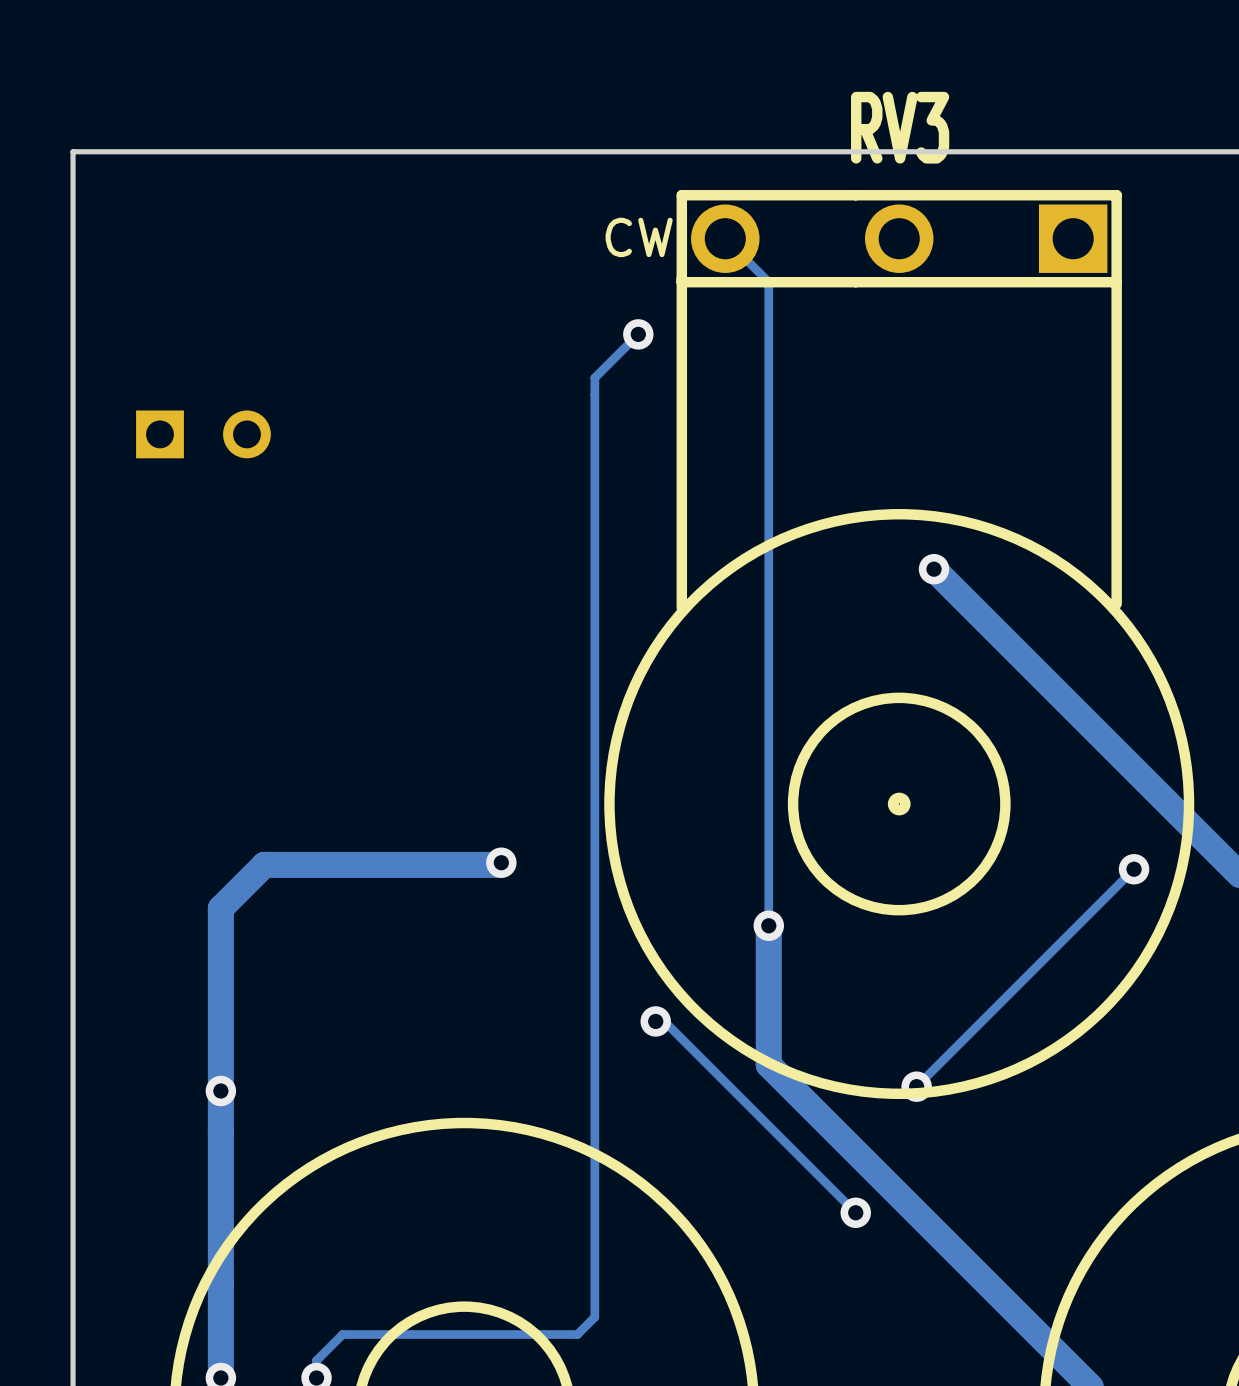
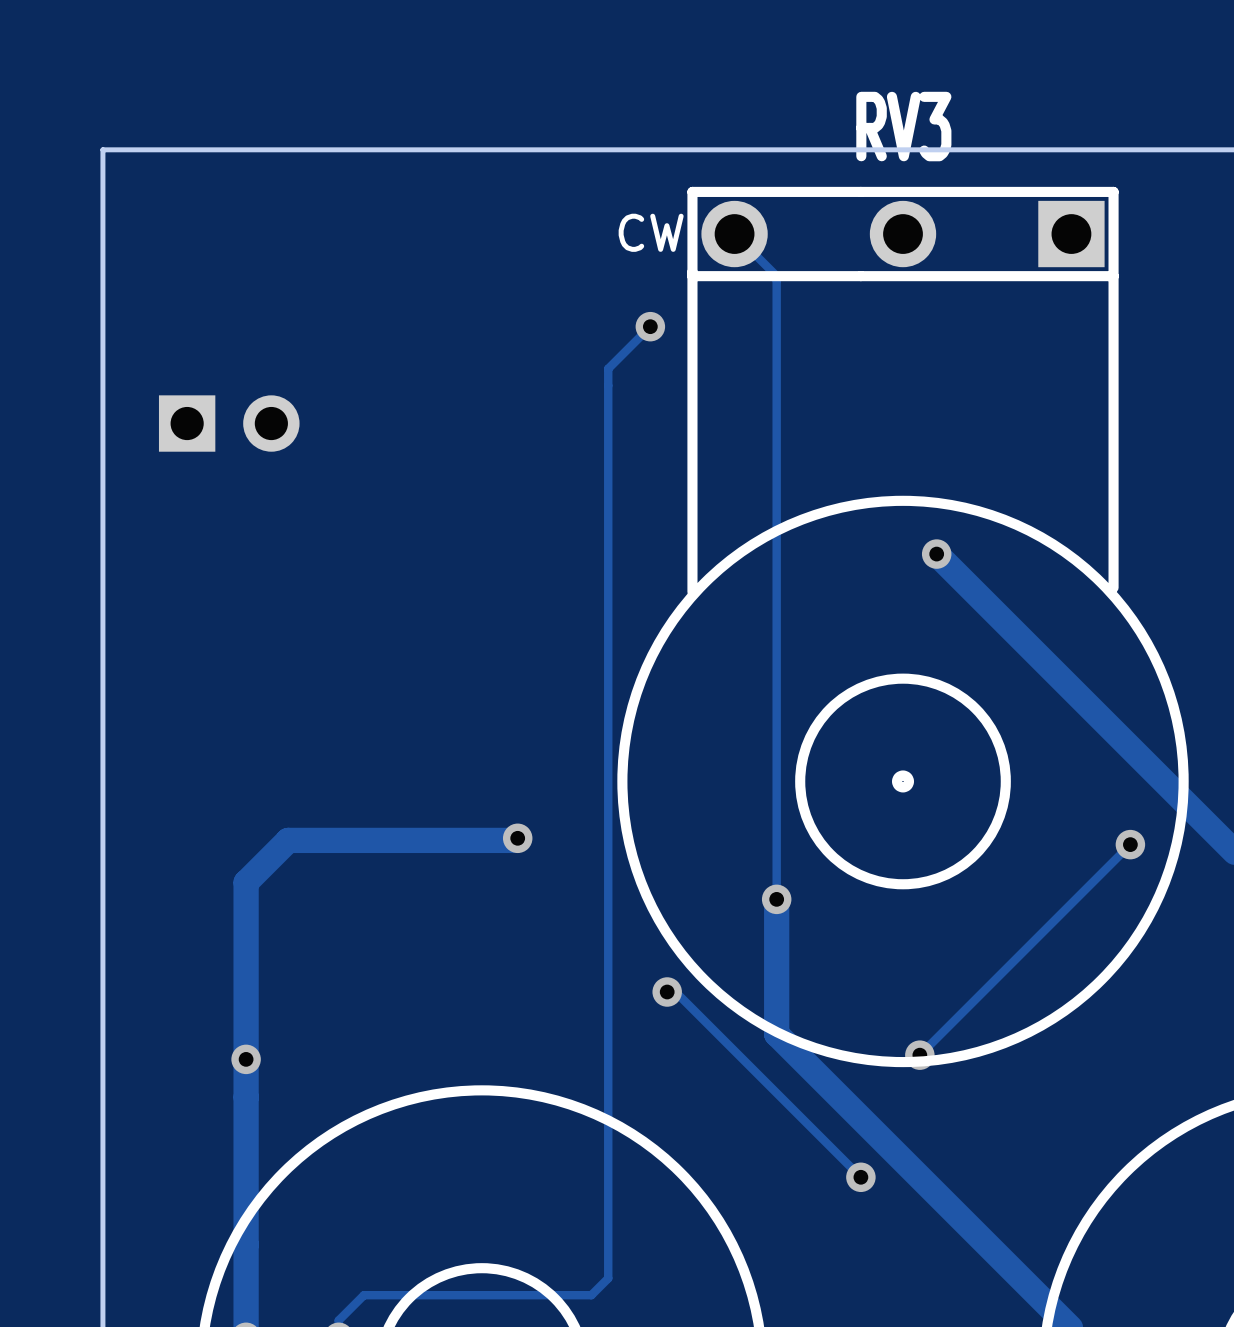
part footprint: [136, 410, 271, 459] -> [158, 395, 300, 452]

